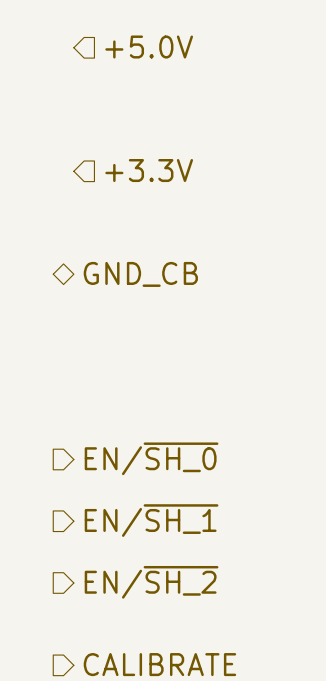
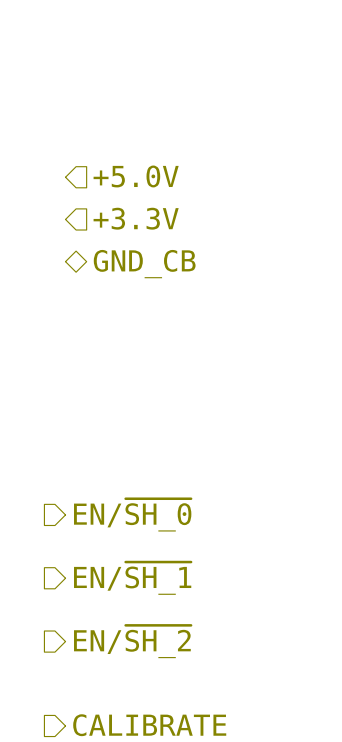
hierarchical label position: +5.0V (149, 47) -> +5.0V (136, 176)
hierarchical label position: GND_CB (140, 274) -> GND_CB (144, 264)

